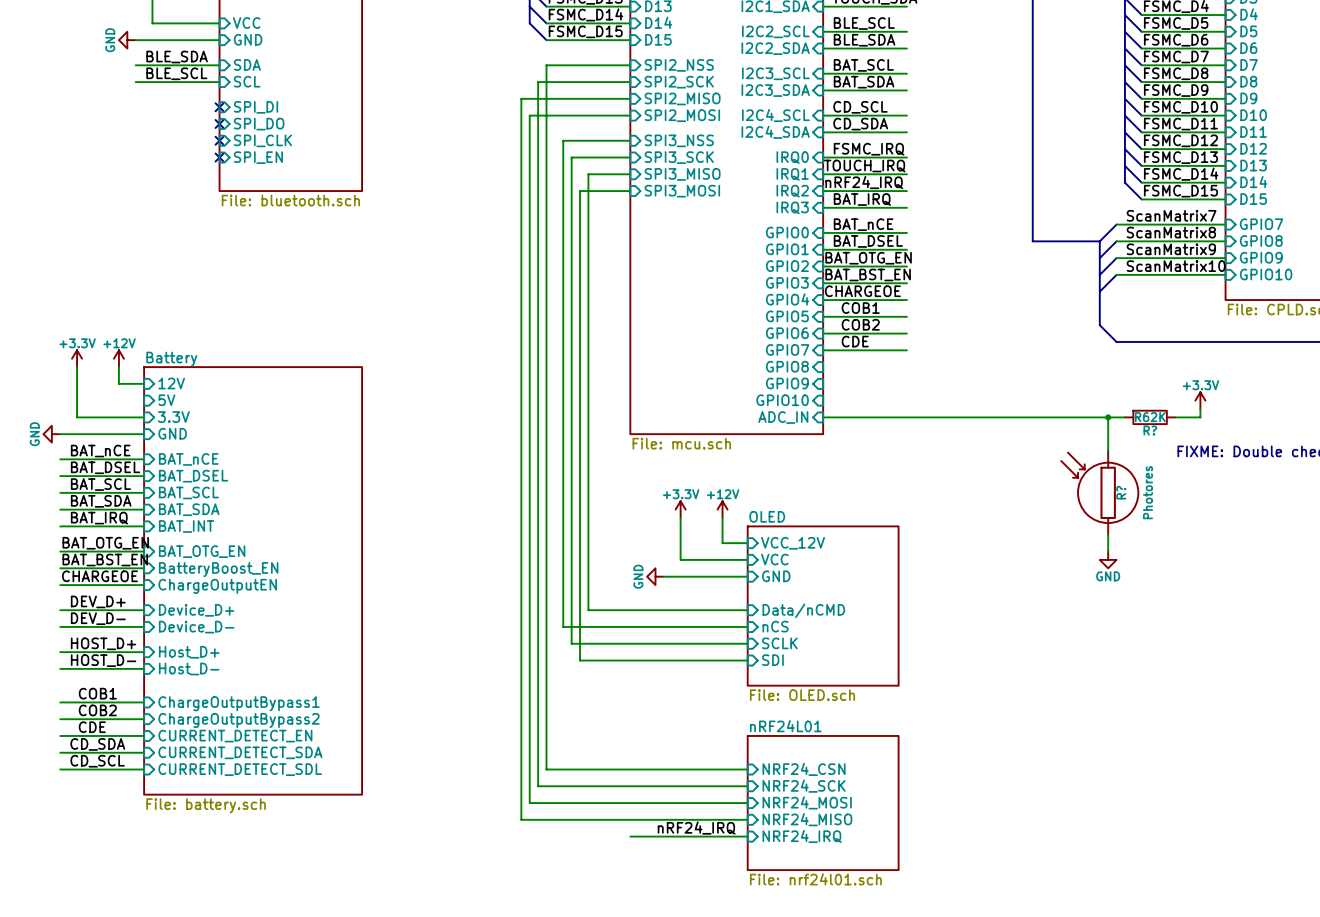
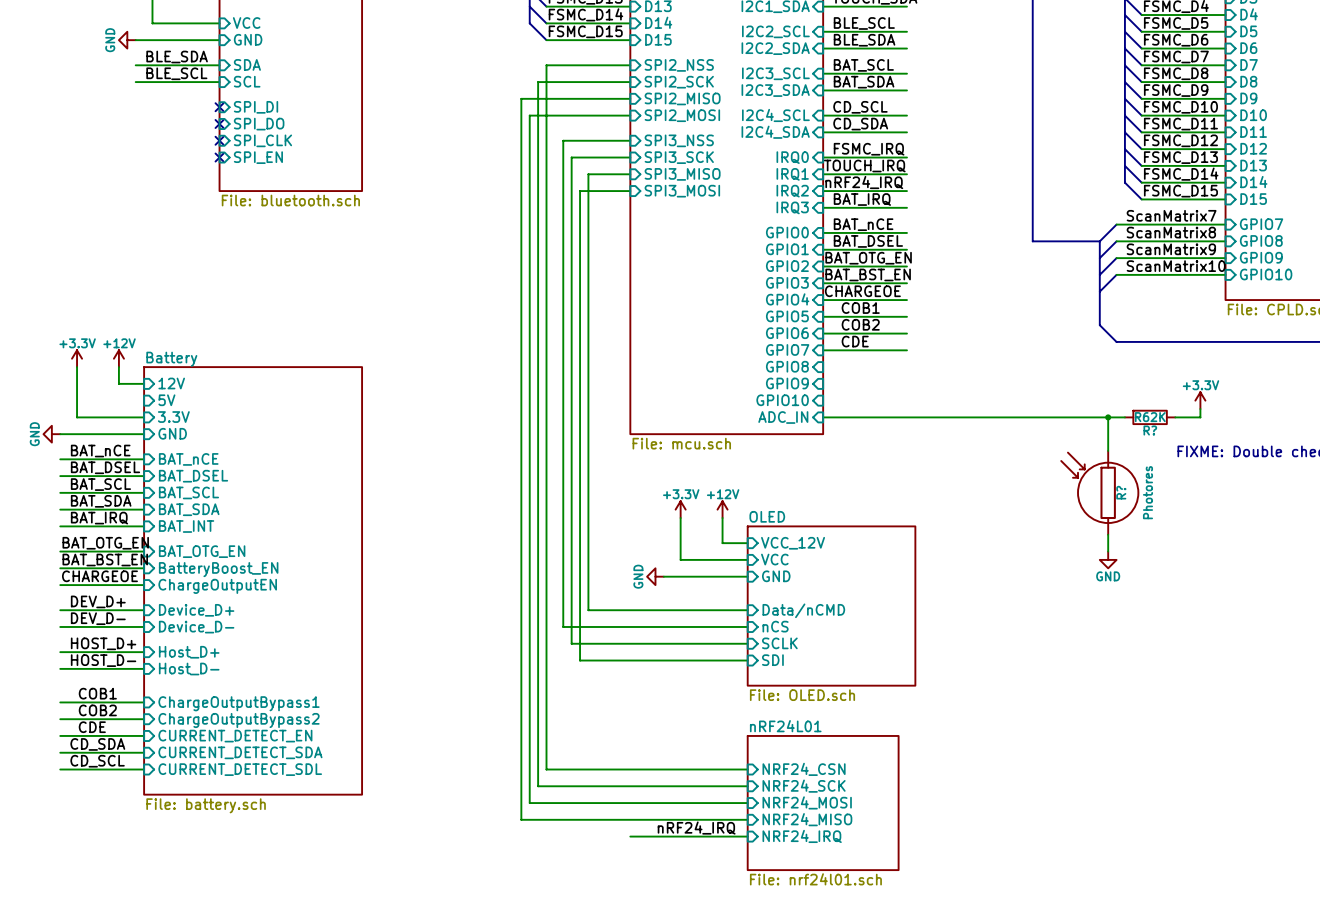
sheet OLED: File: OLED.sch (823, 606) -> none
sheet OLED: none -> File: OLED.sch (831, 606)

